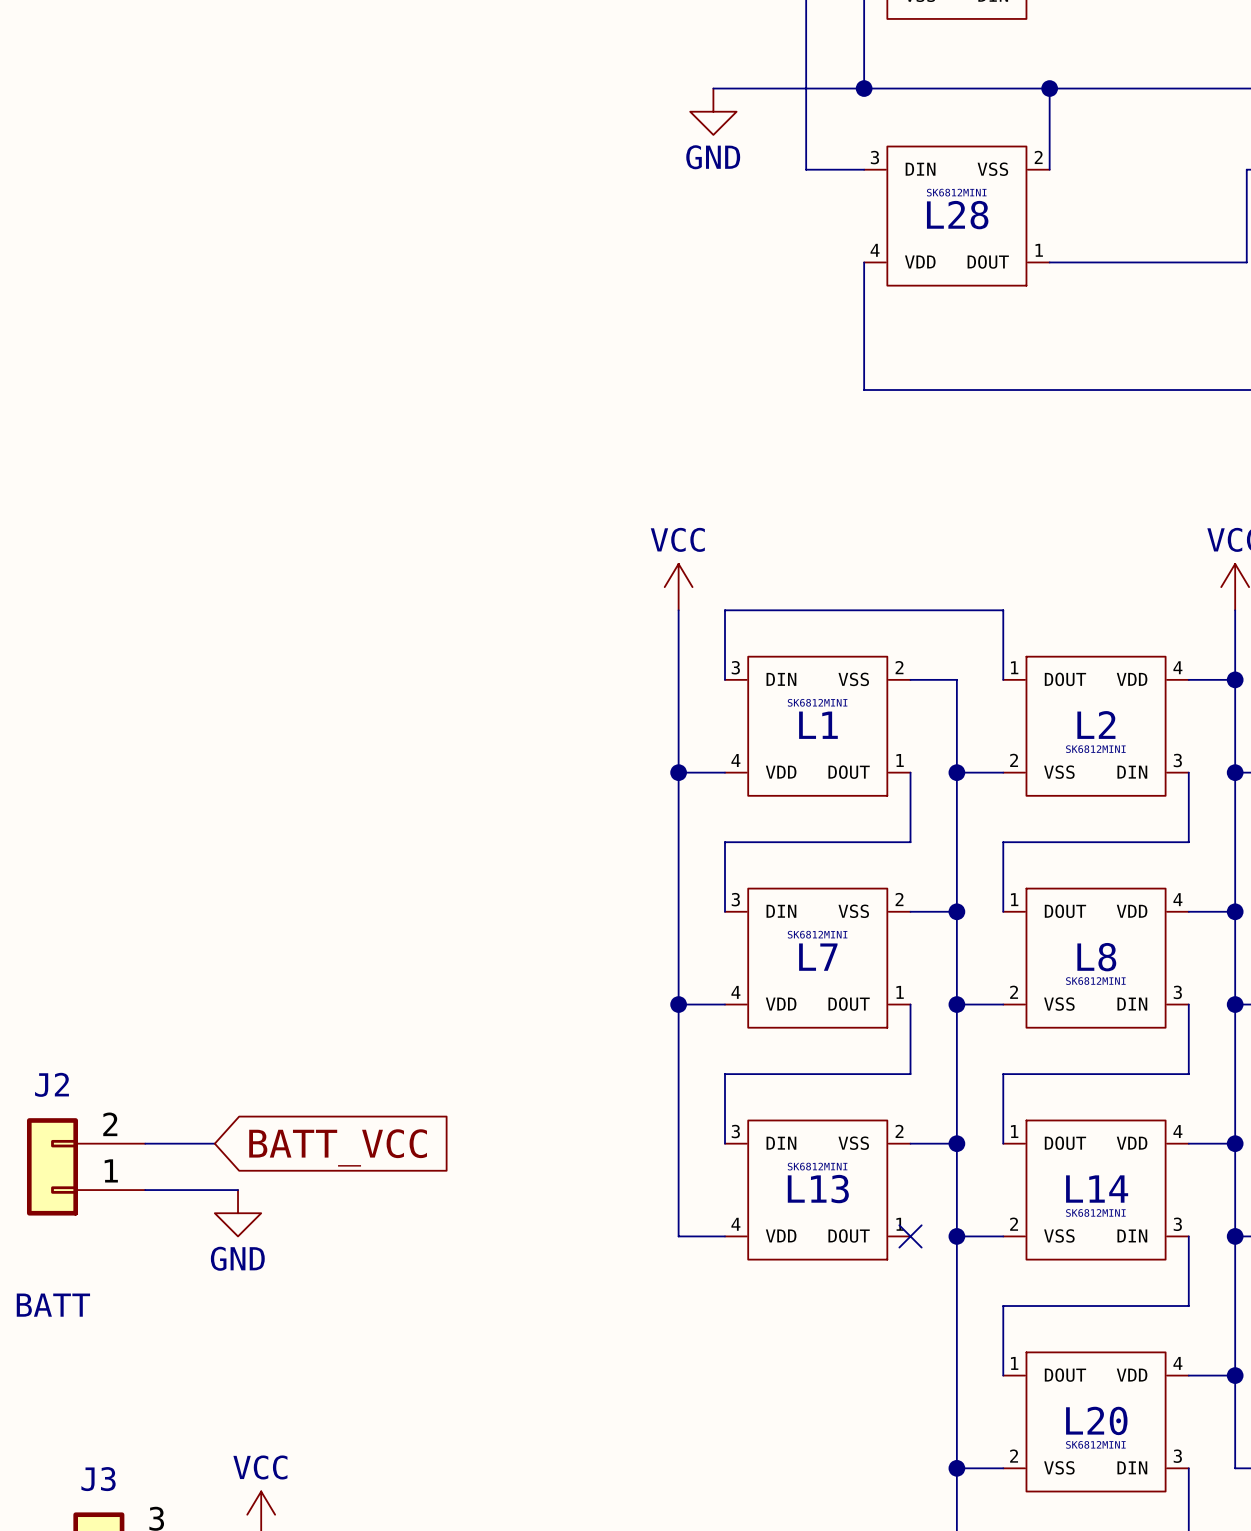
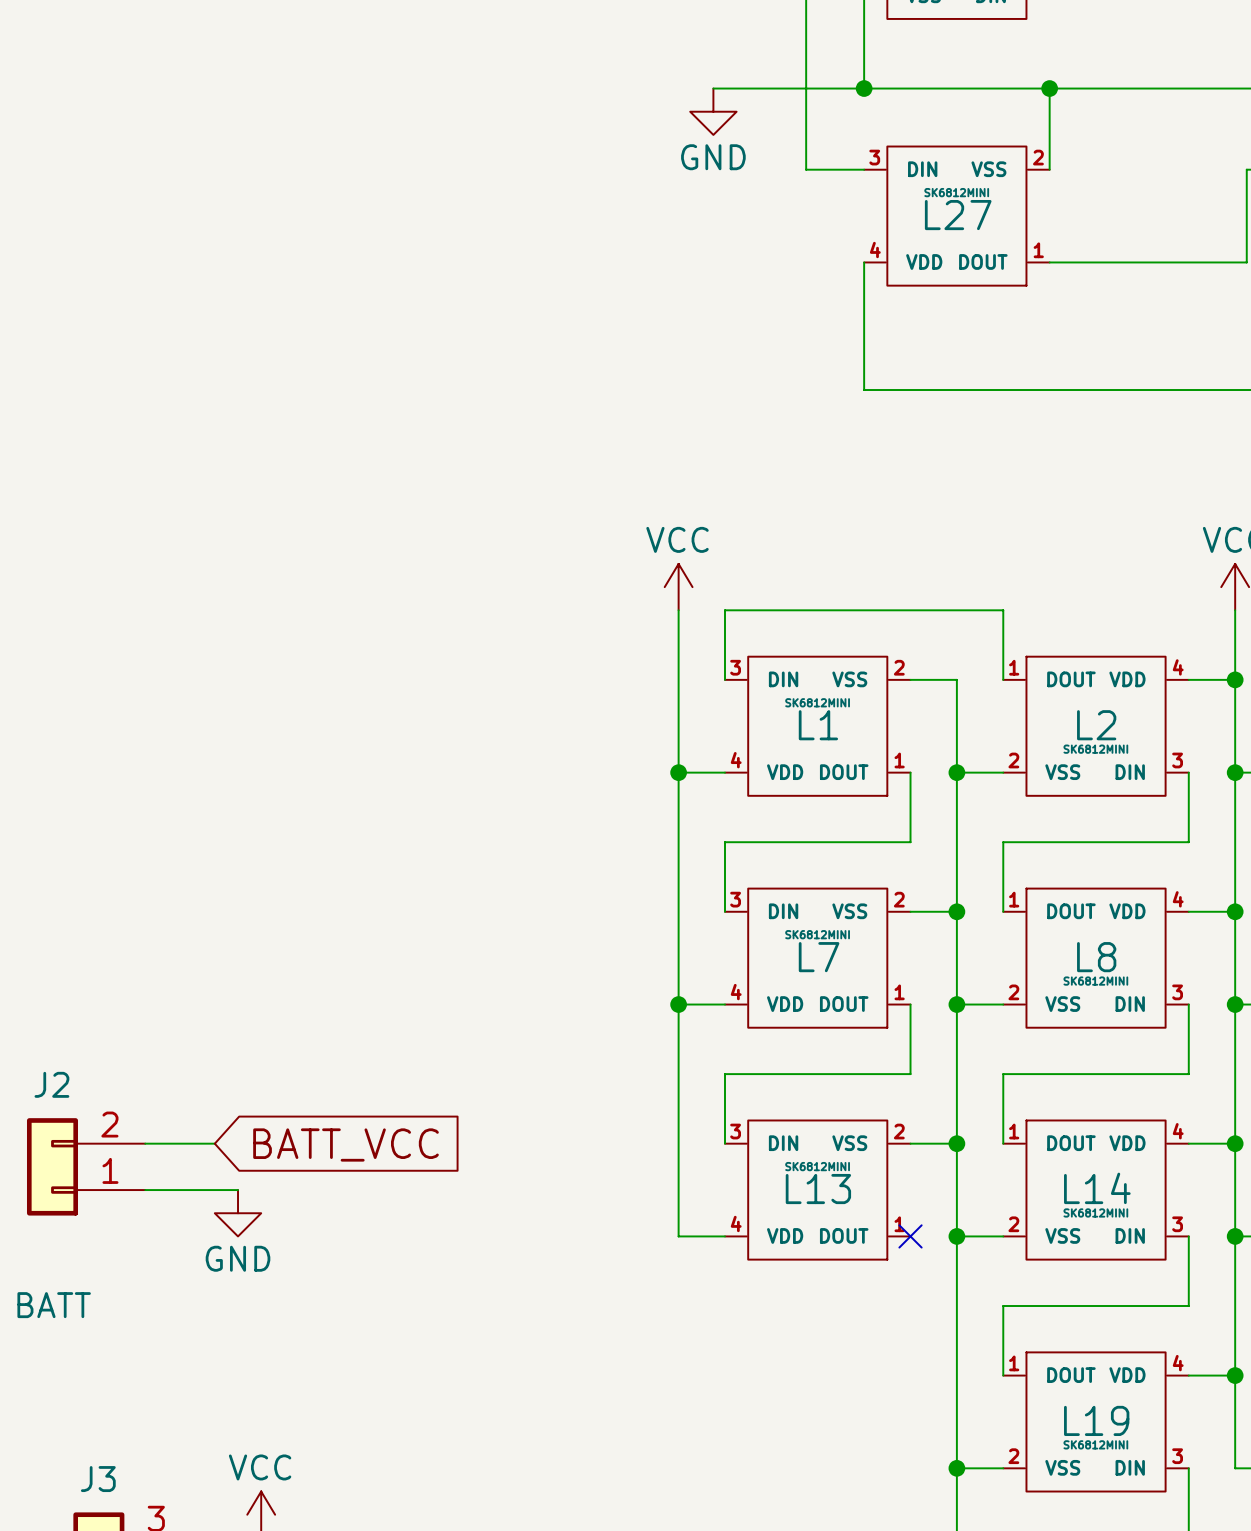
L28 name: L28 (957, 215) -> L27 (958, 215)
L20 name: L20 (1096, 1420) -> L19 (1096, 1420)

